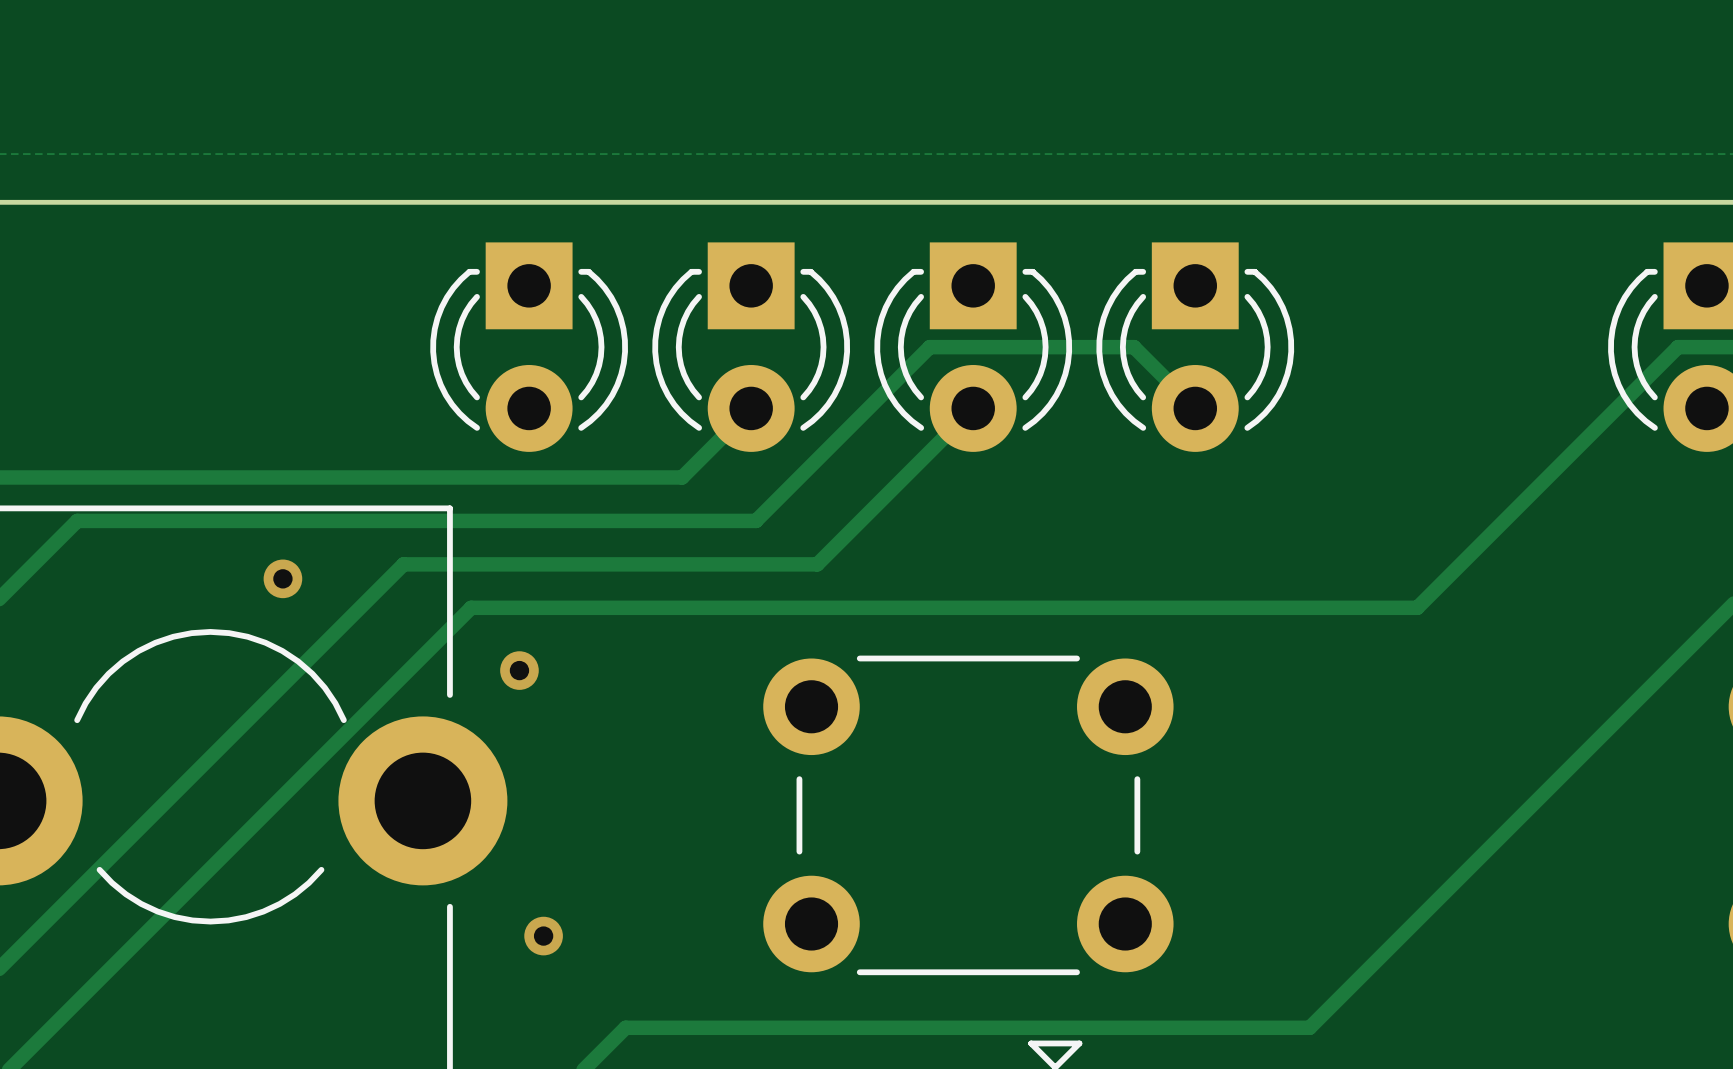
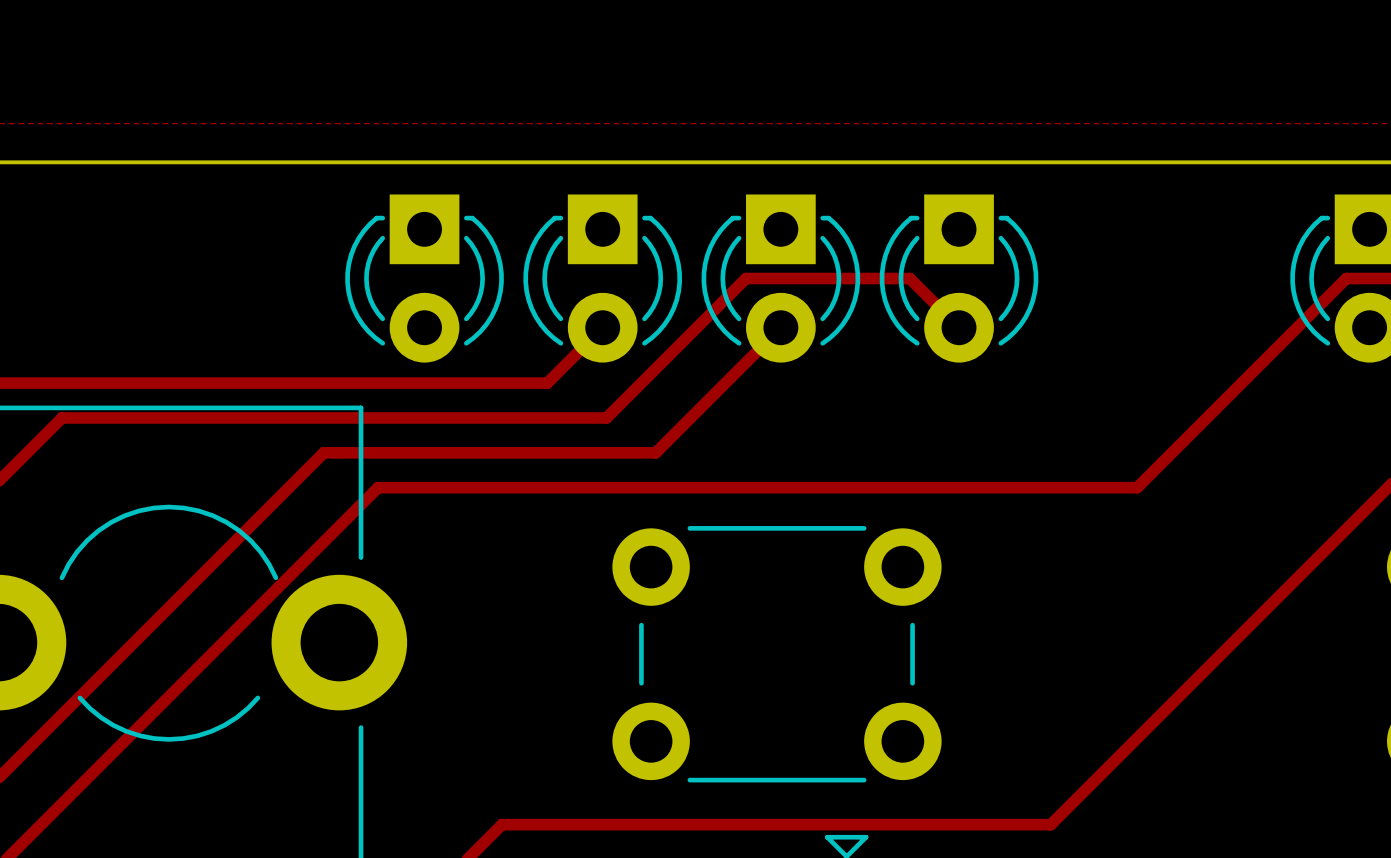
via: (282, 578) -> none
via: (519, 670) -> none
via: (543, 936) -> none

